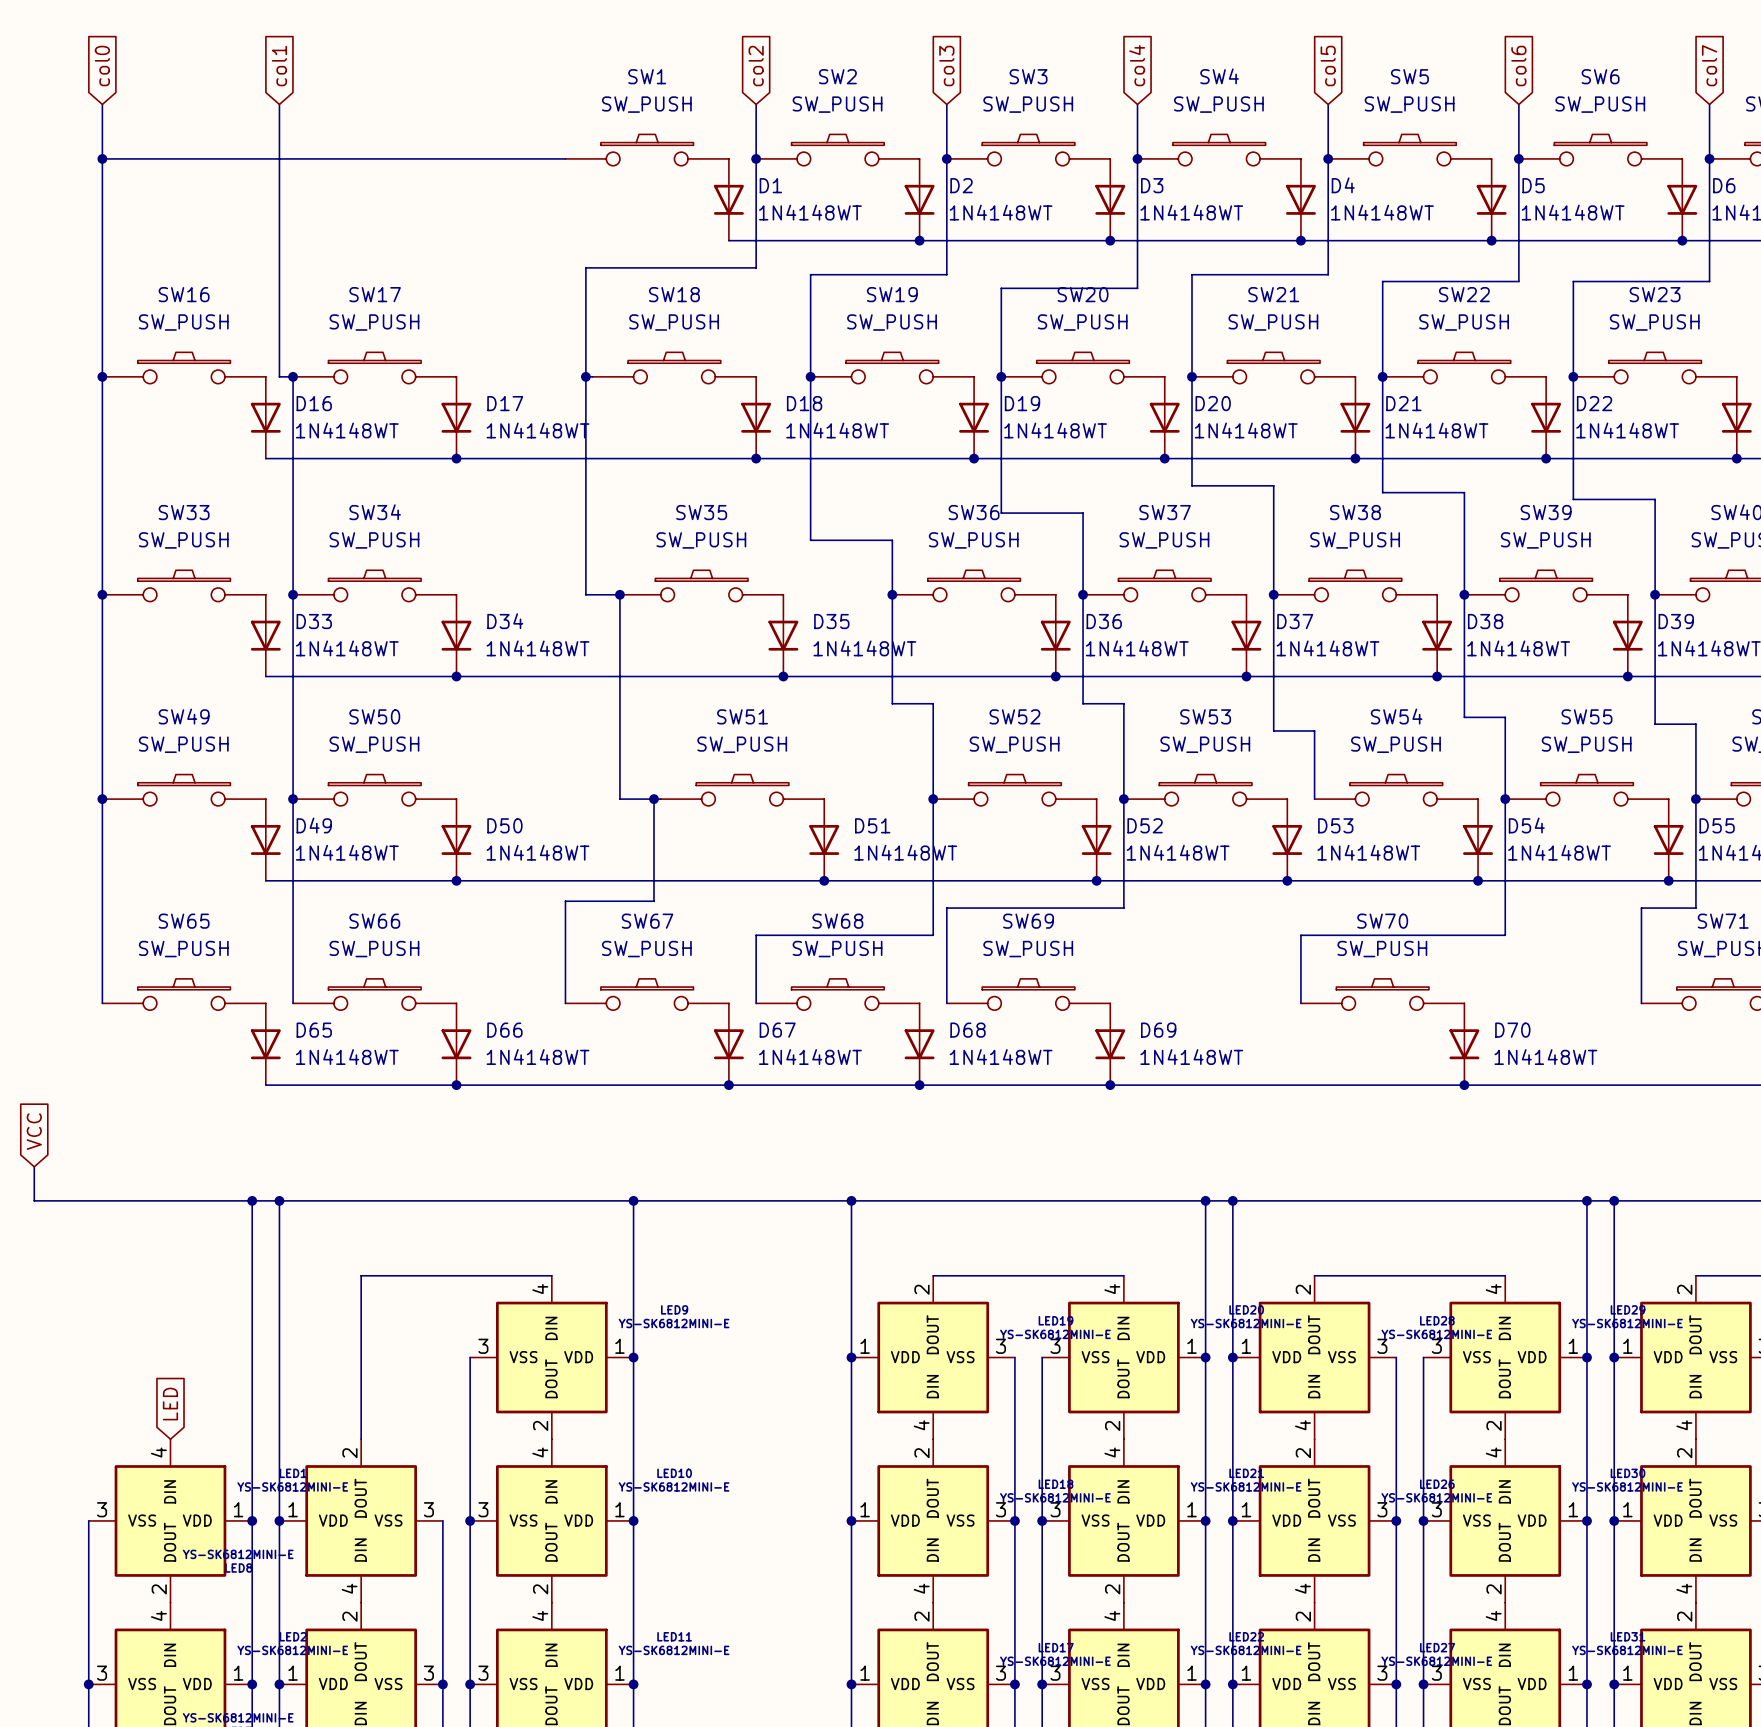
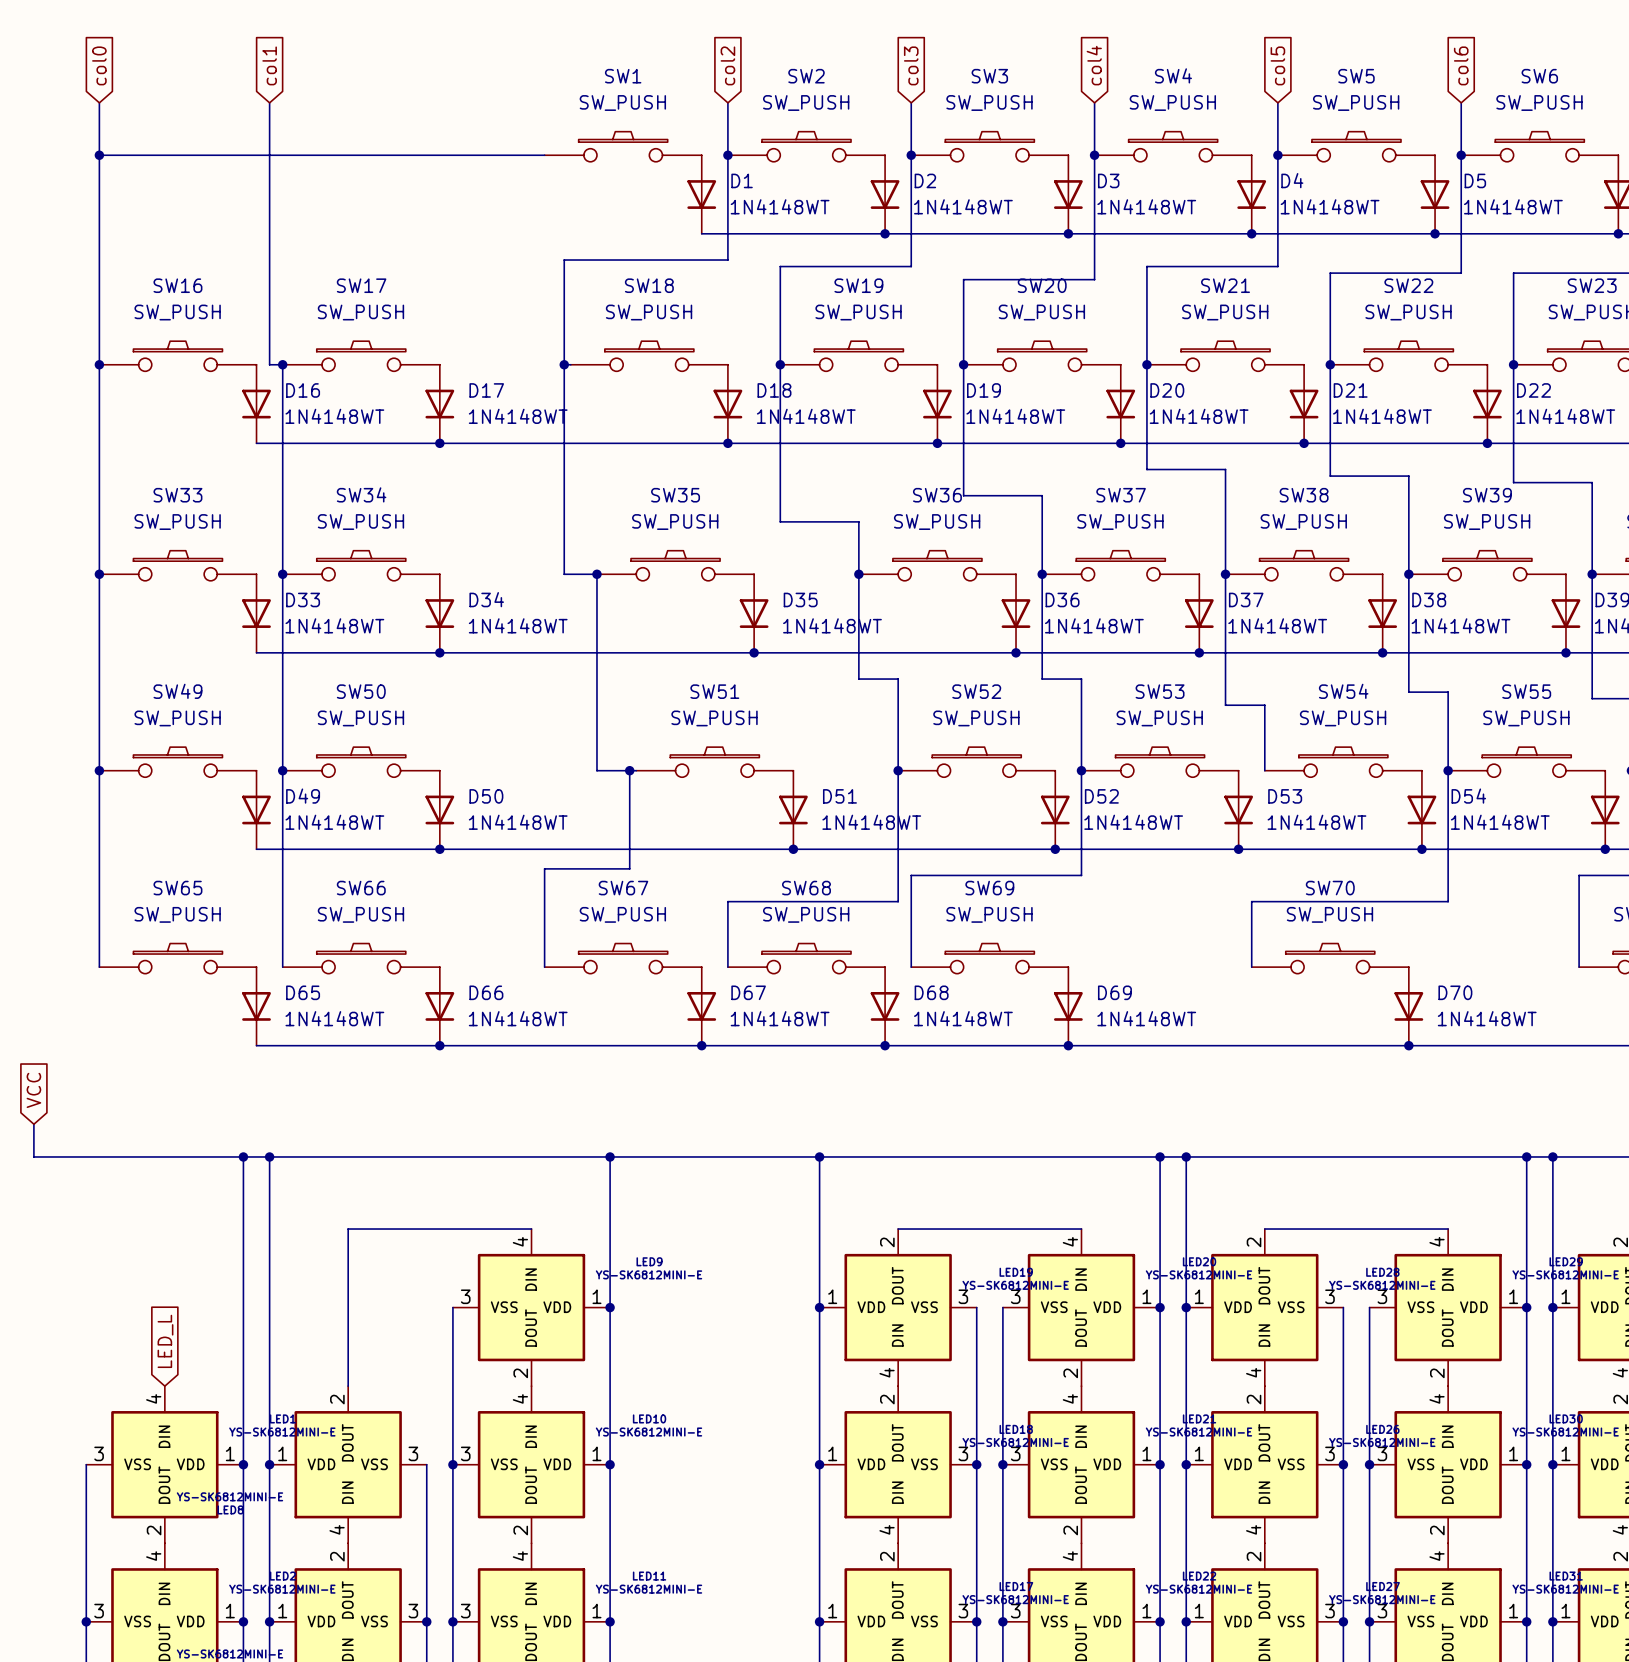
global label: LED (170, 1404) -> LED_L (165, 1341)

